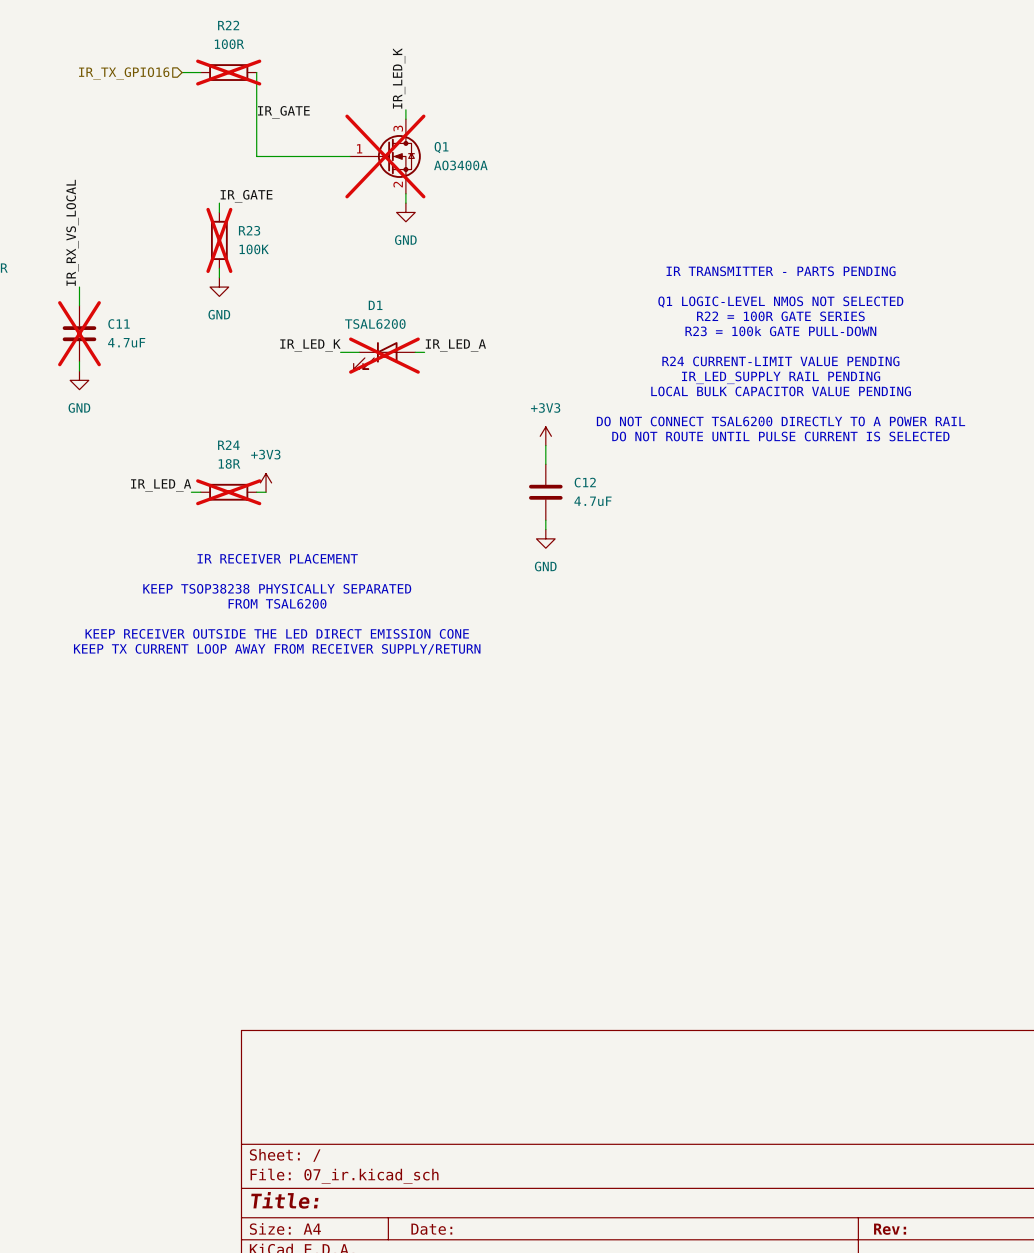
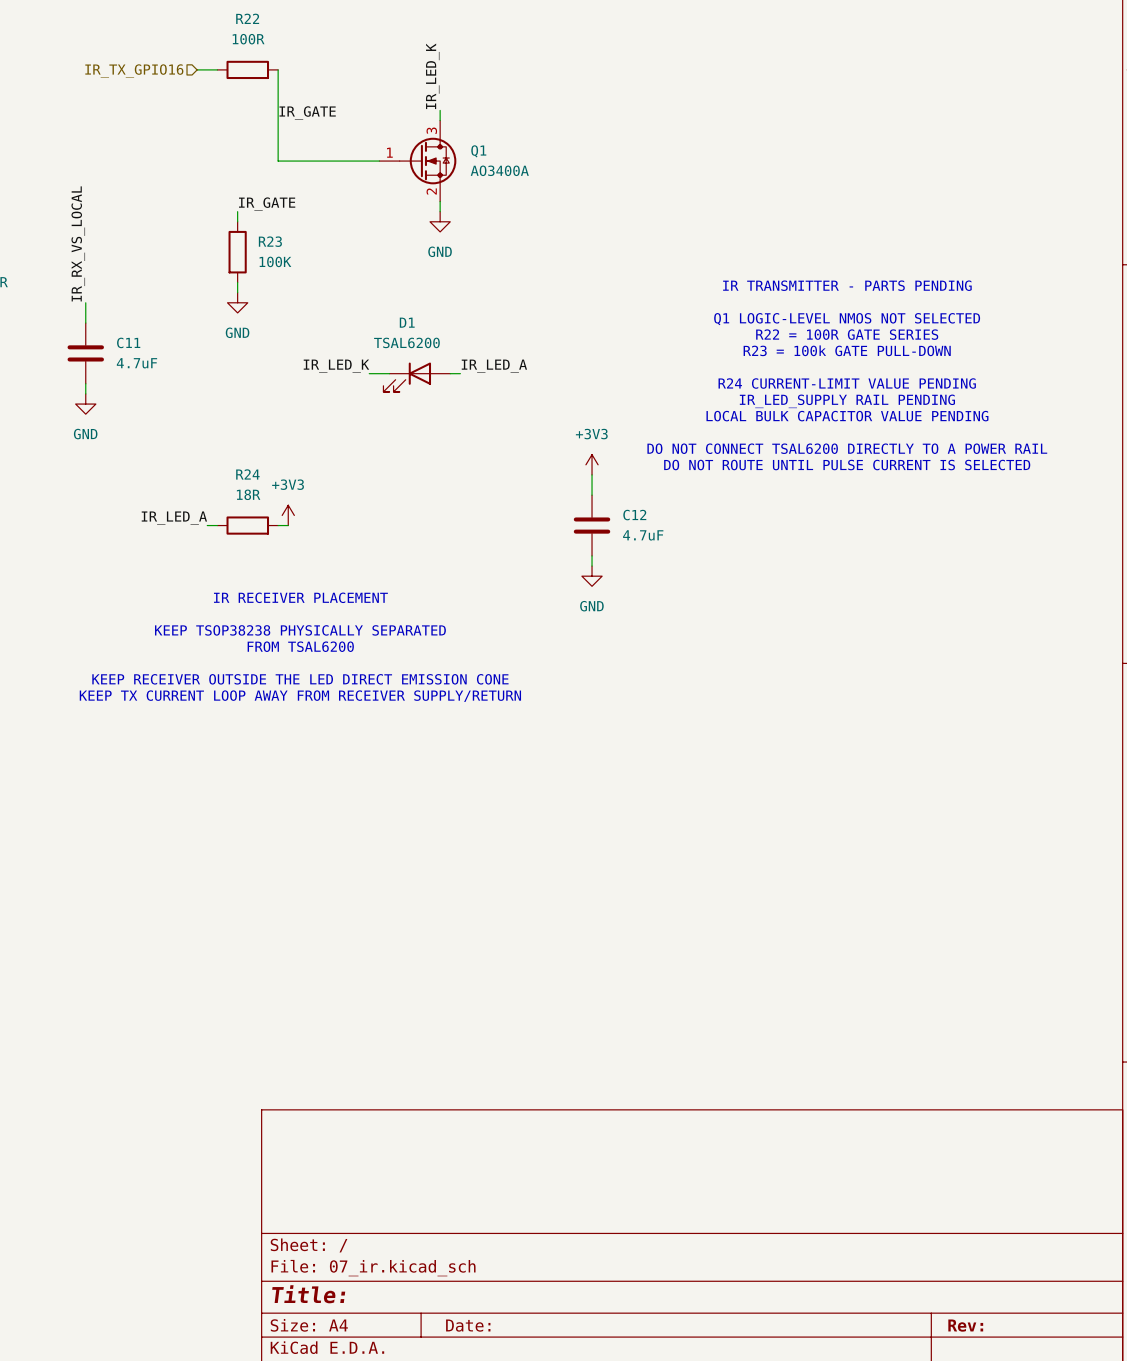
R22 do-not-place cross: (228, 72) -> none
Q1 do-not-place cross: (385, 156) -> none
R23 do-not-place cross: (219, 240) -> none
C11 do-not-place cross: (79, 333) -> none
D1 do-not-place cross: (384, 355) -> none
R24 do-not-place cross: (228, 492) -> none

